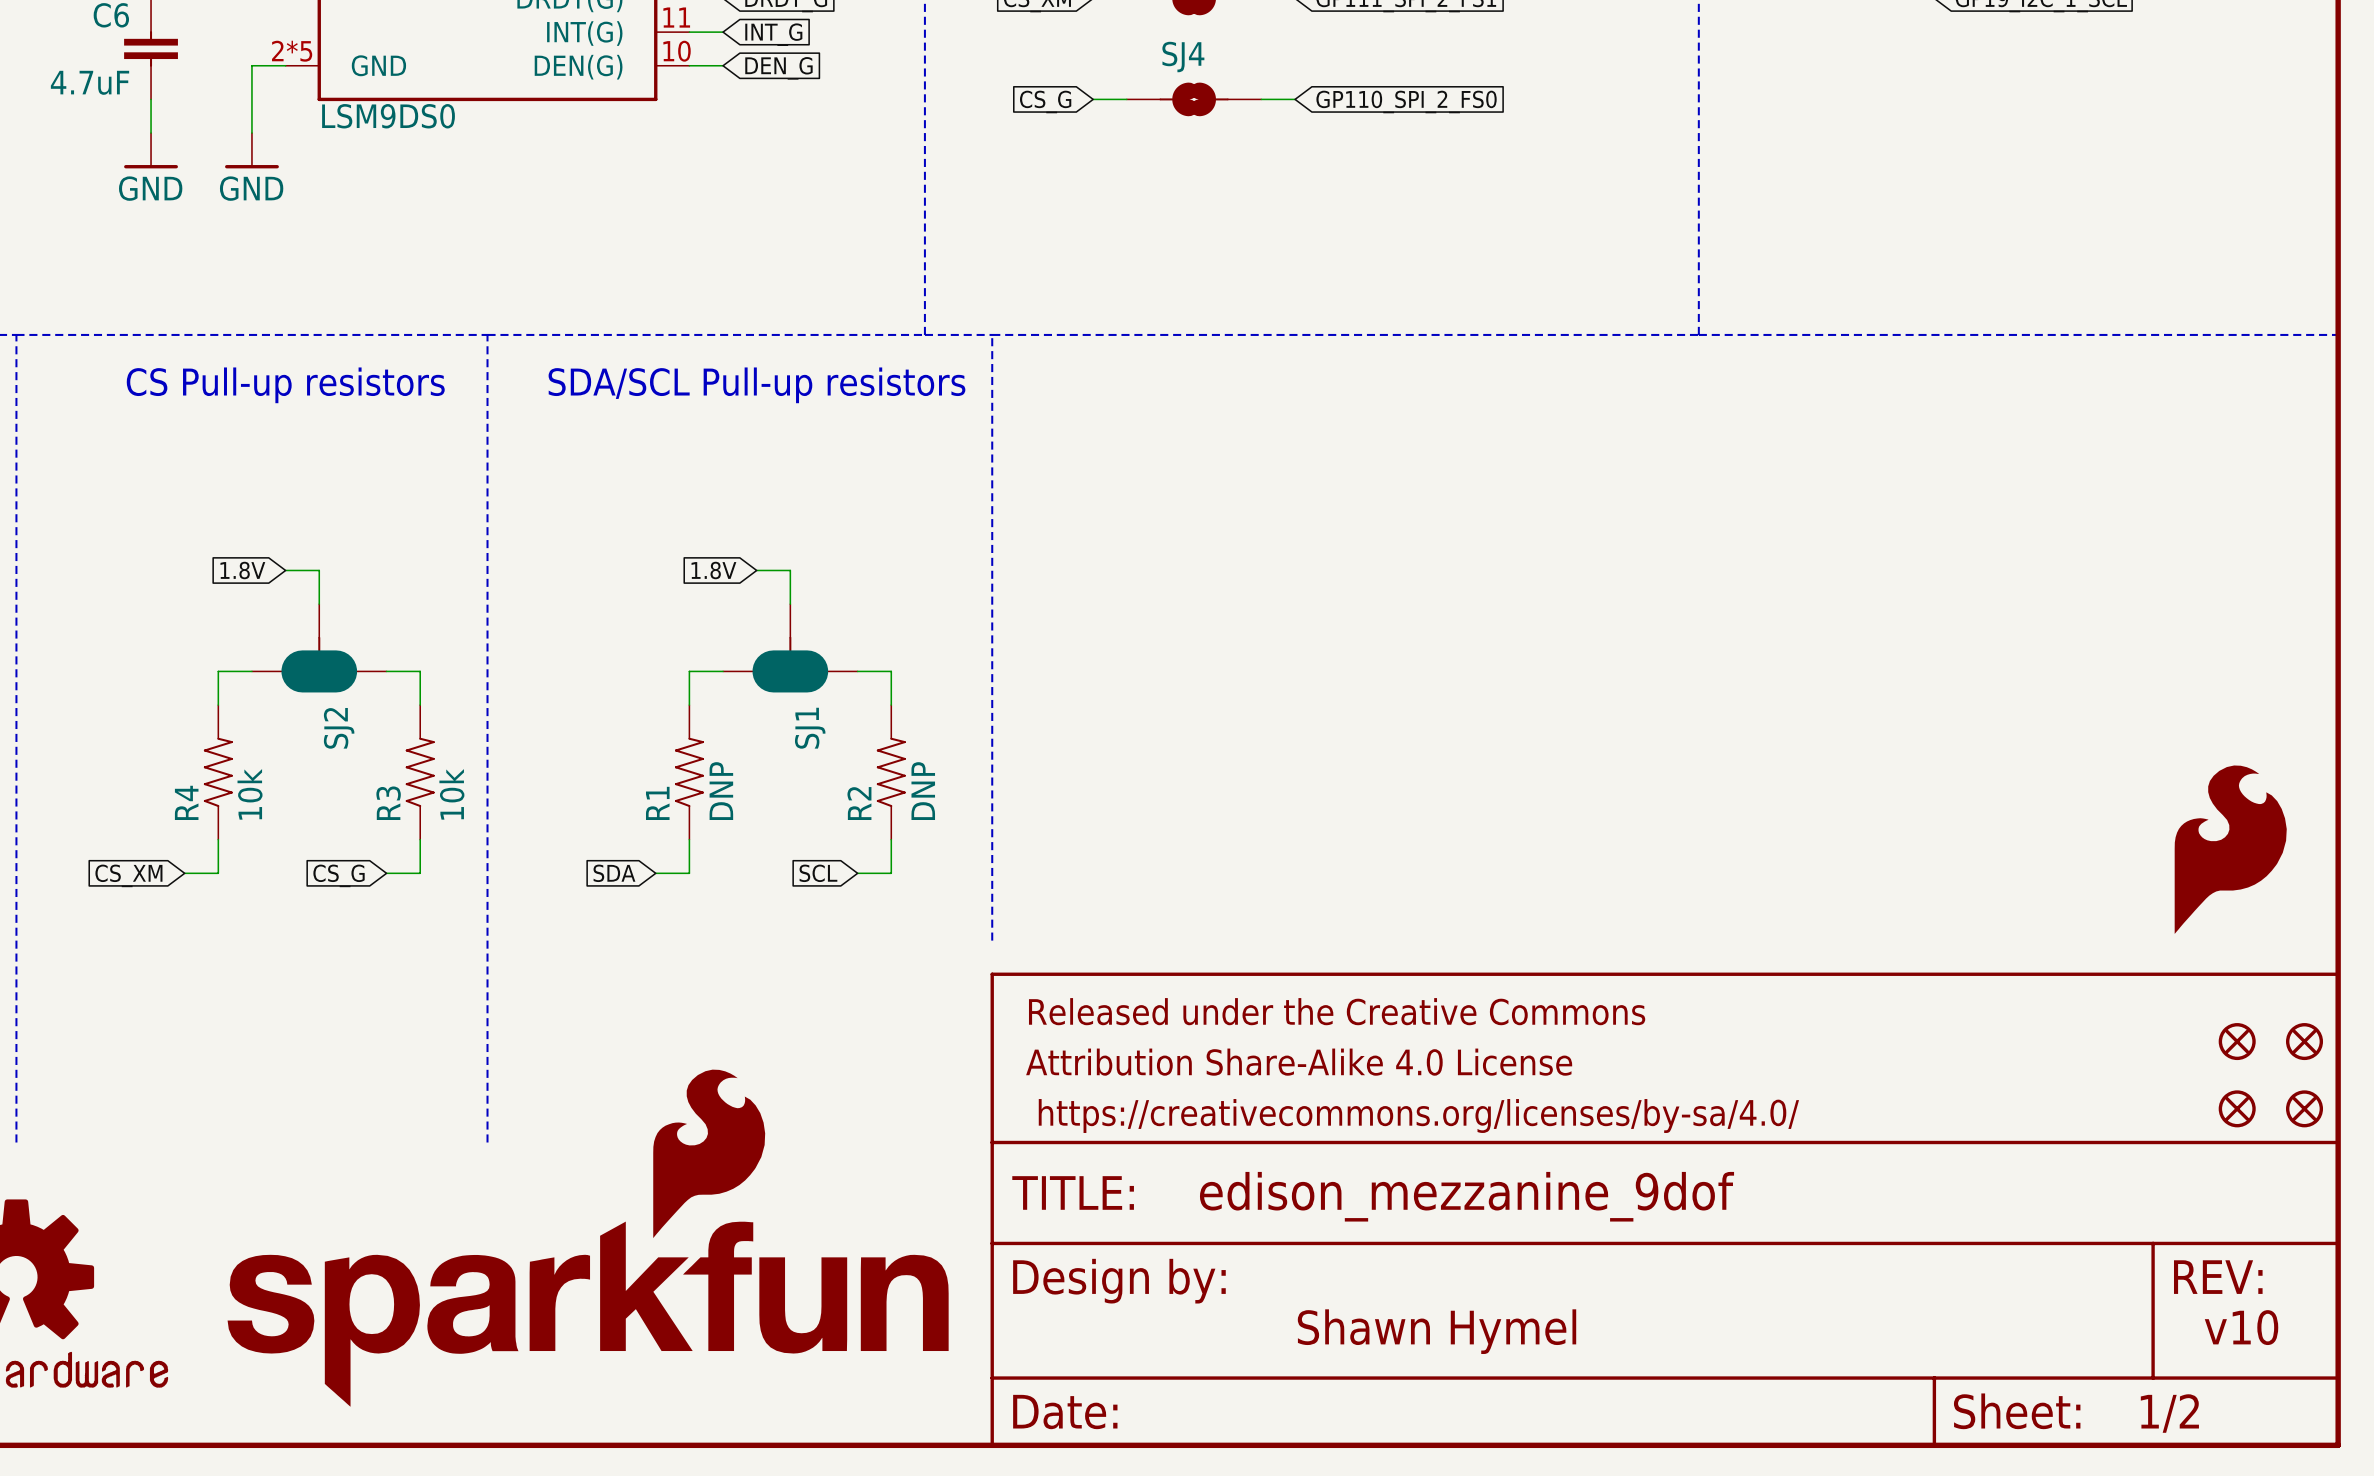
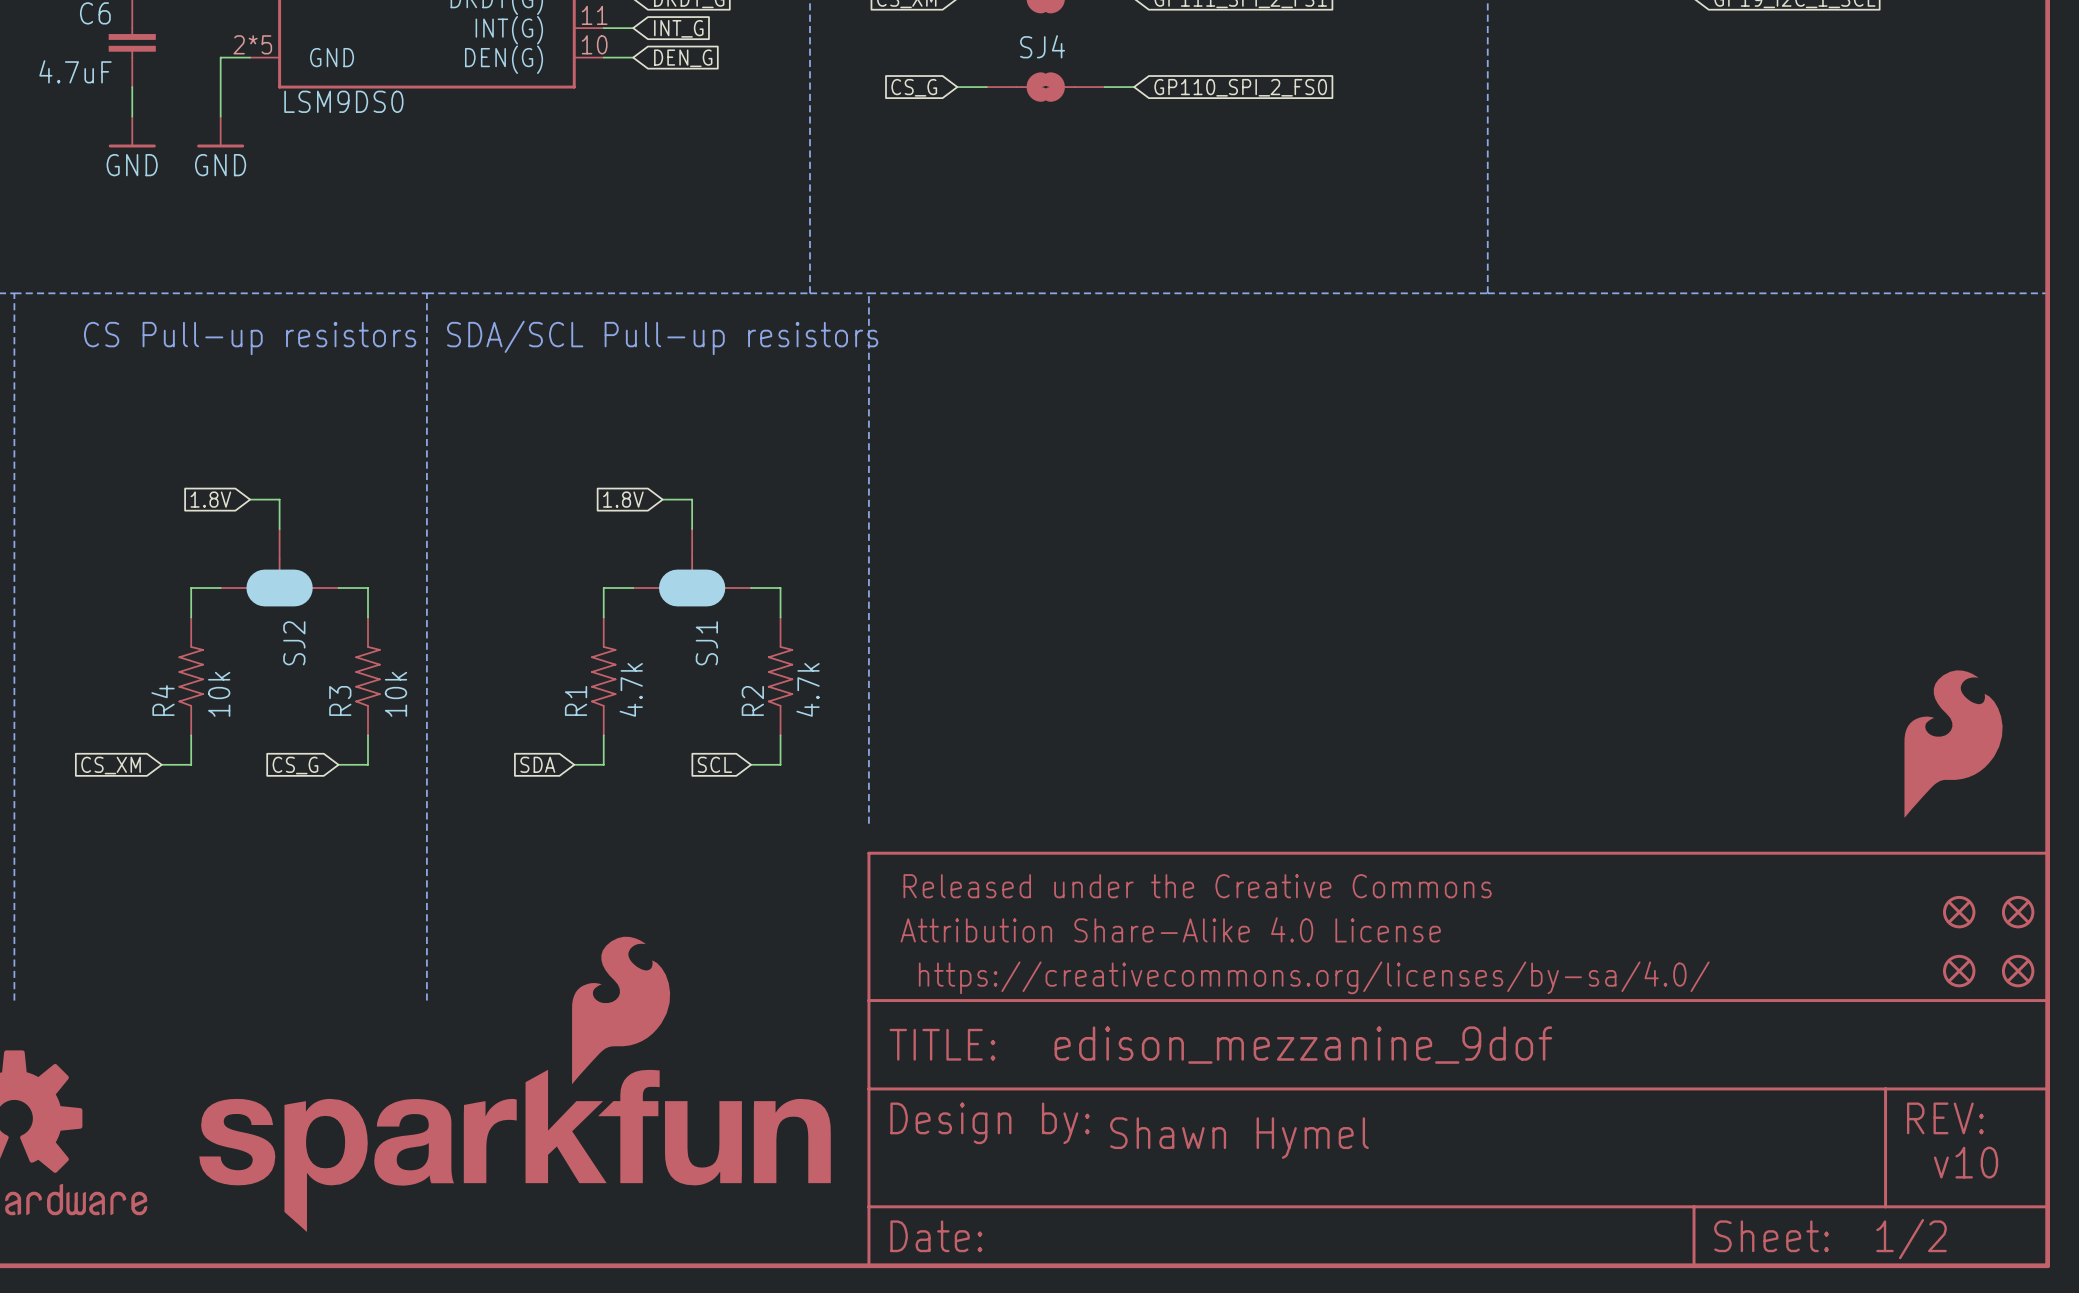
R1 value: DNP (721, 791) -> 4.7k (631, 689)
R2 value: DNP (923, 791) -> 4.7k (808, 689)
text position: Shawn Hymel (1436, 1331) -> Shawn Hymel (1239, 1138)

